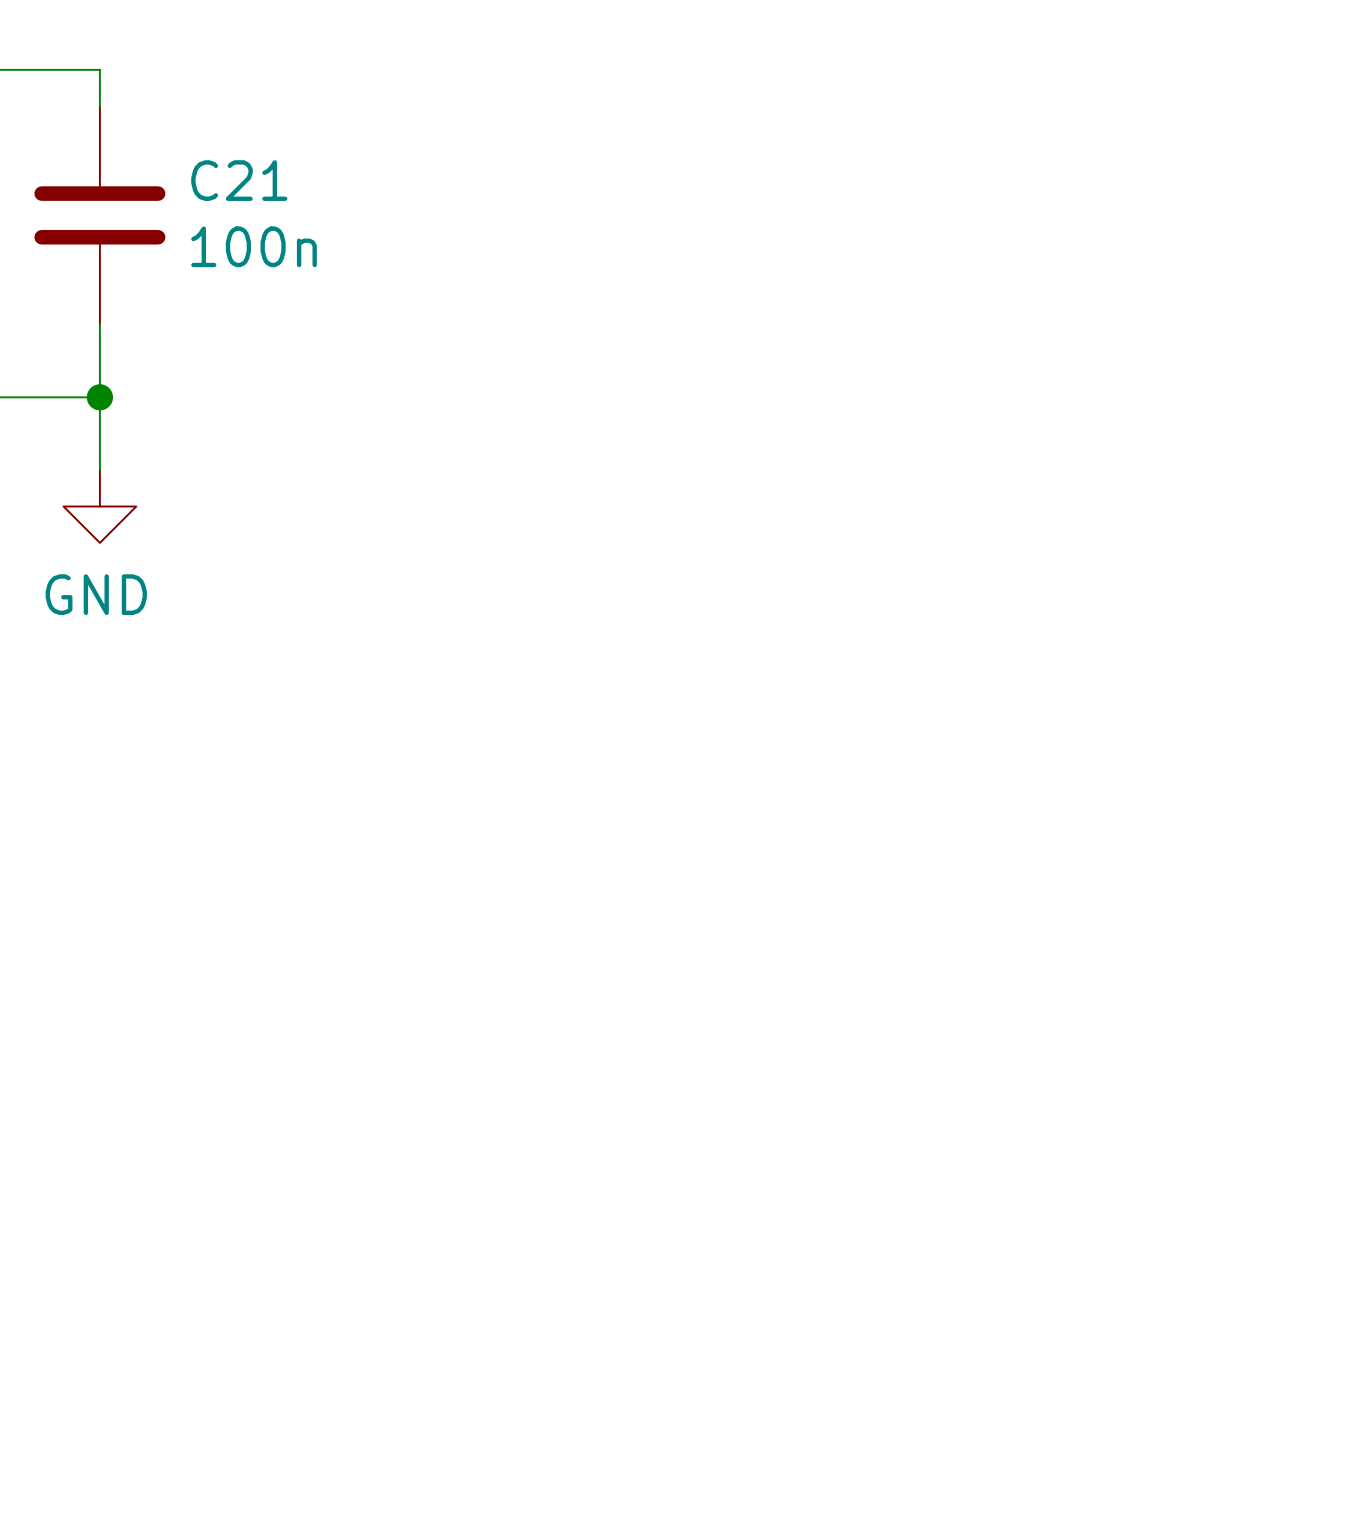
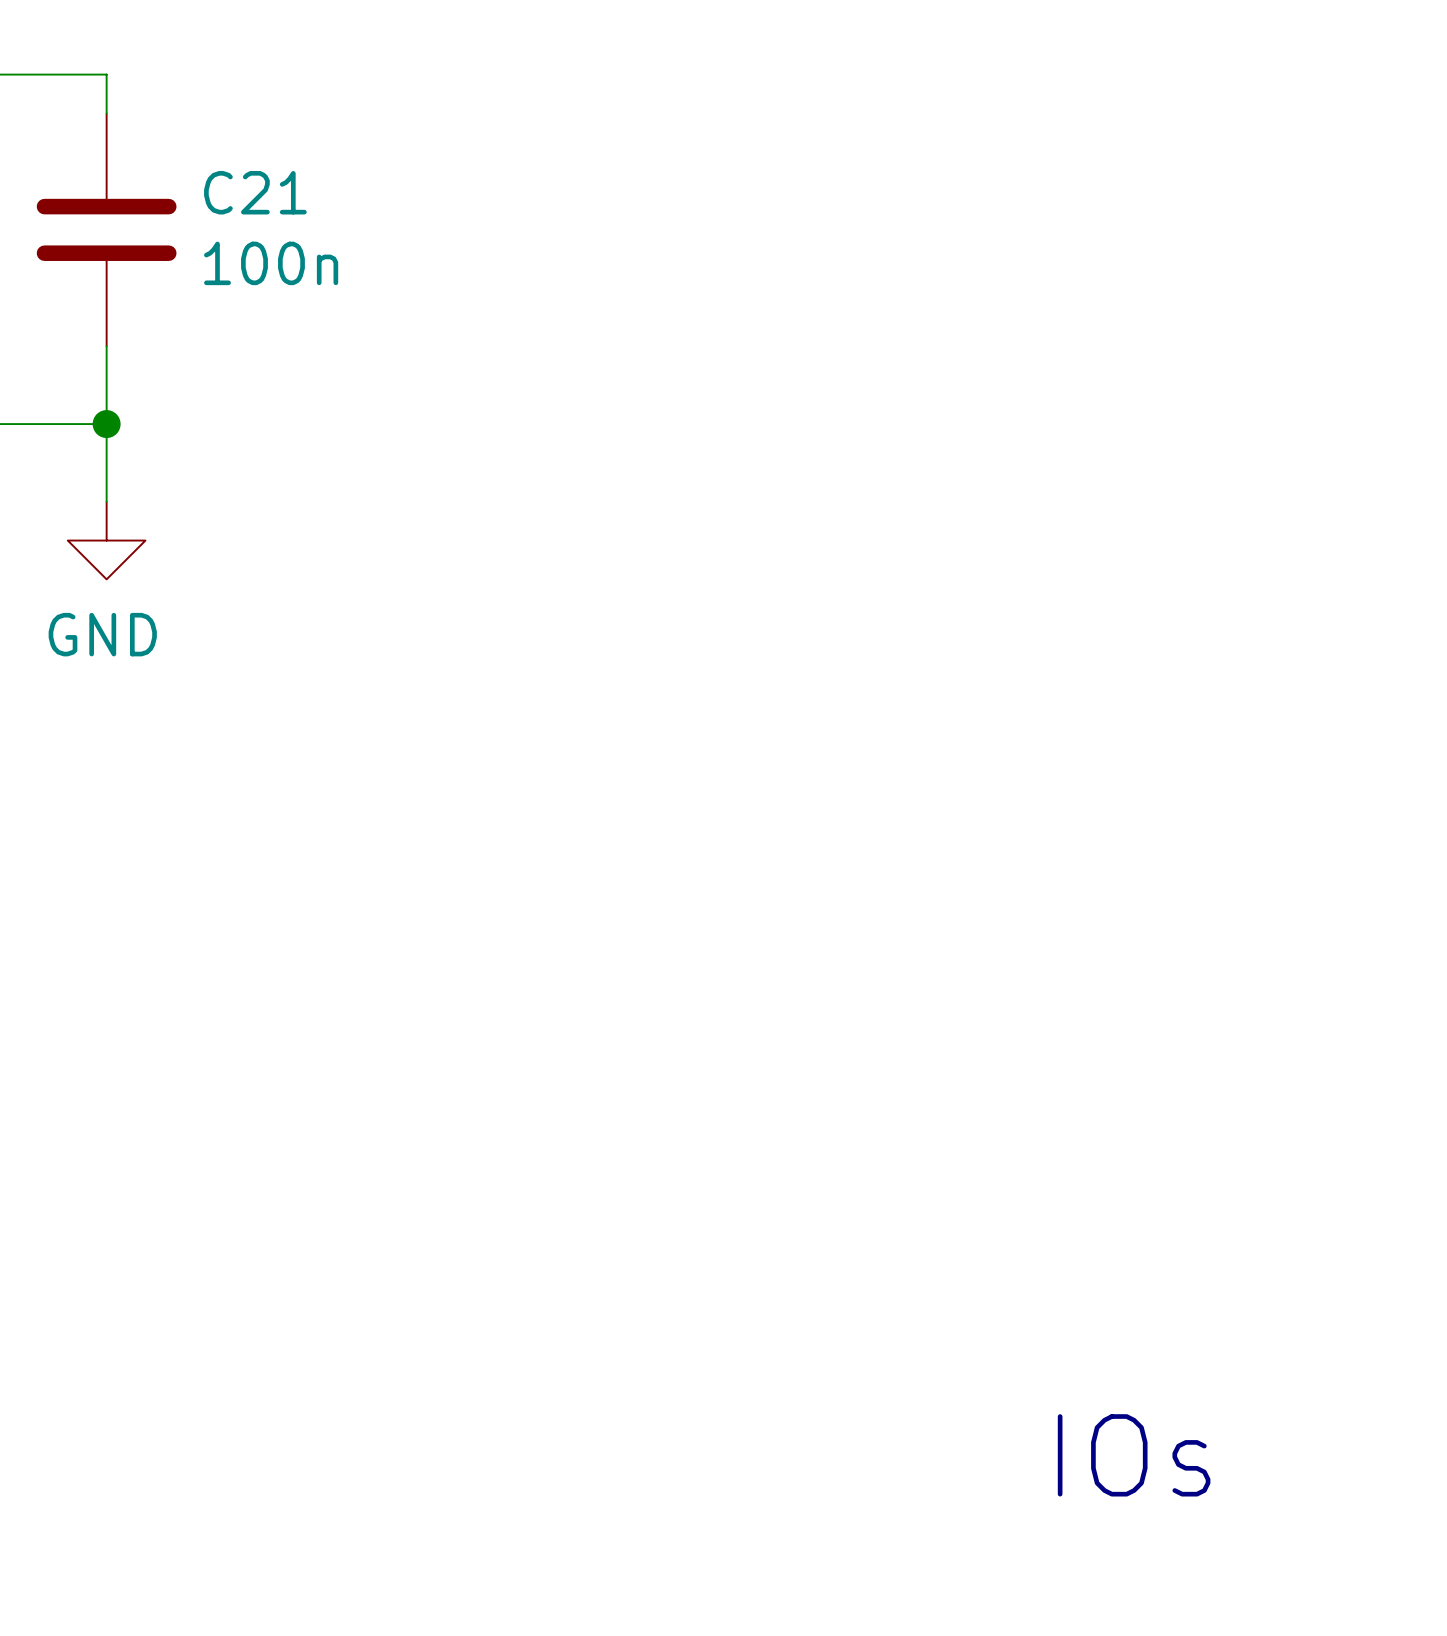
text: none -> IOs (1134, 1455)

